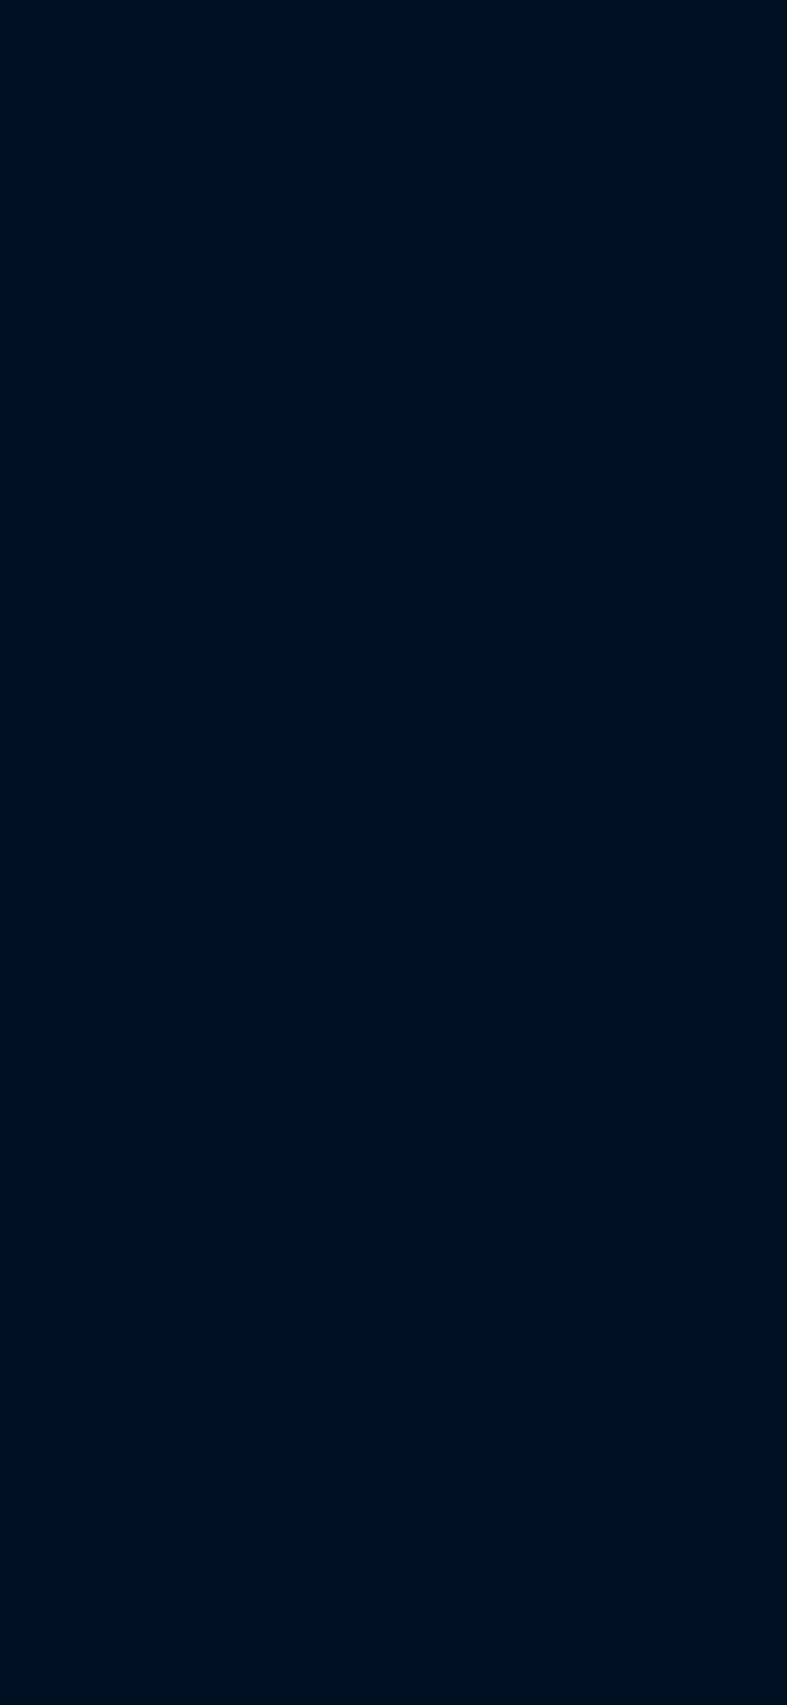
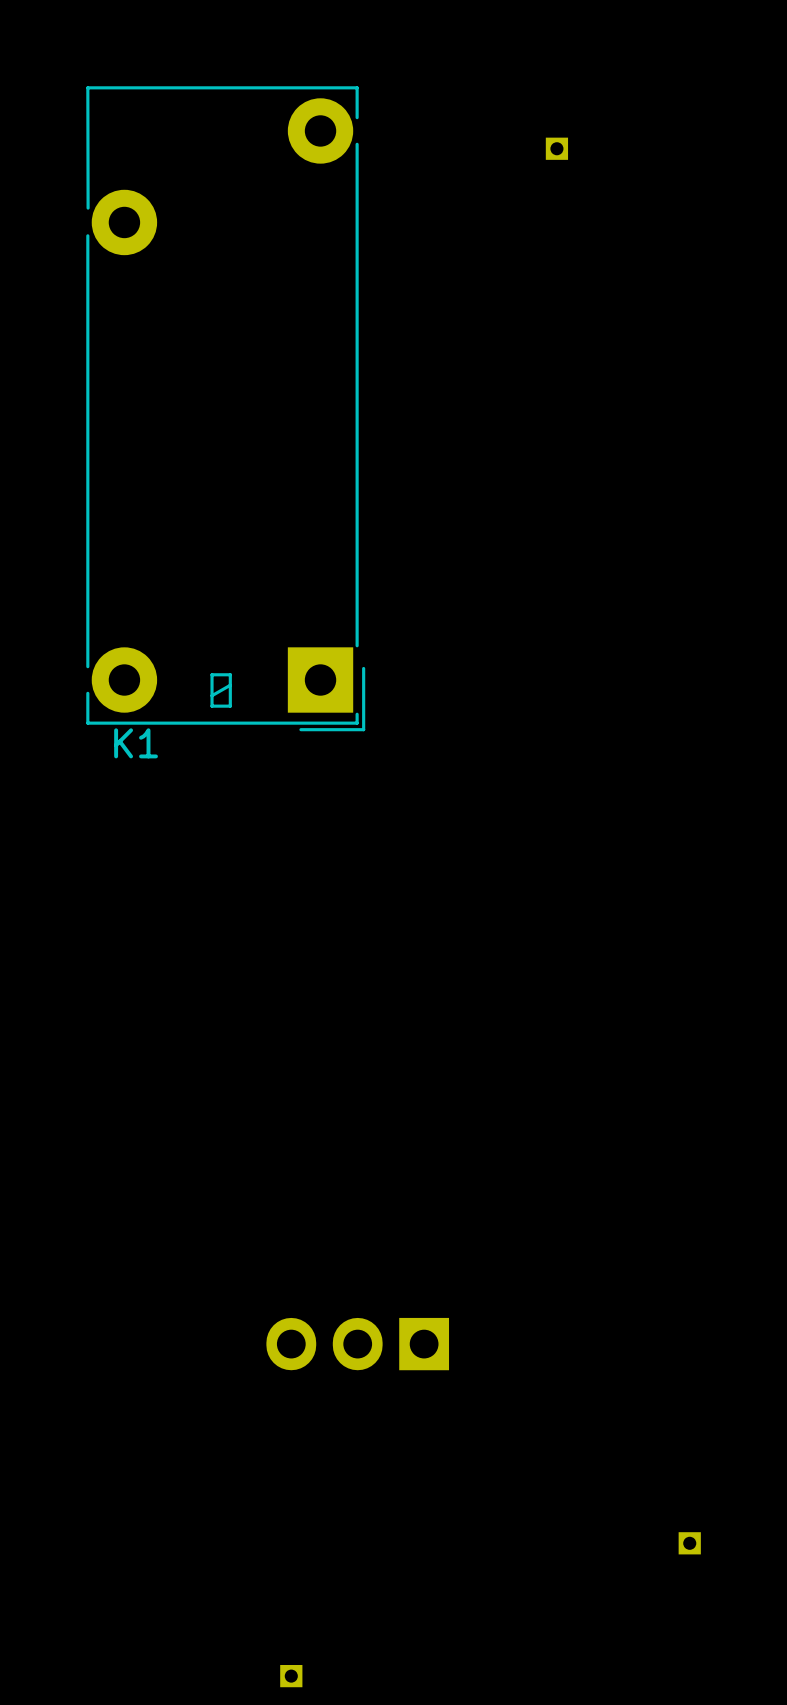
part: none -> (556, 148)
K1: none -> (225, 408)
part: none -> (357, 1344)
part: none -> (689, 1543)
part: none -> (291, 1676)

